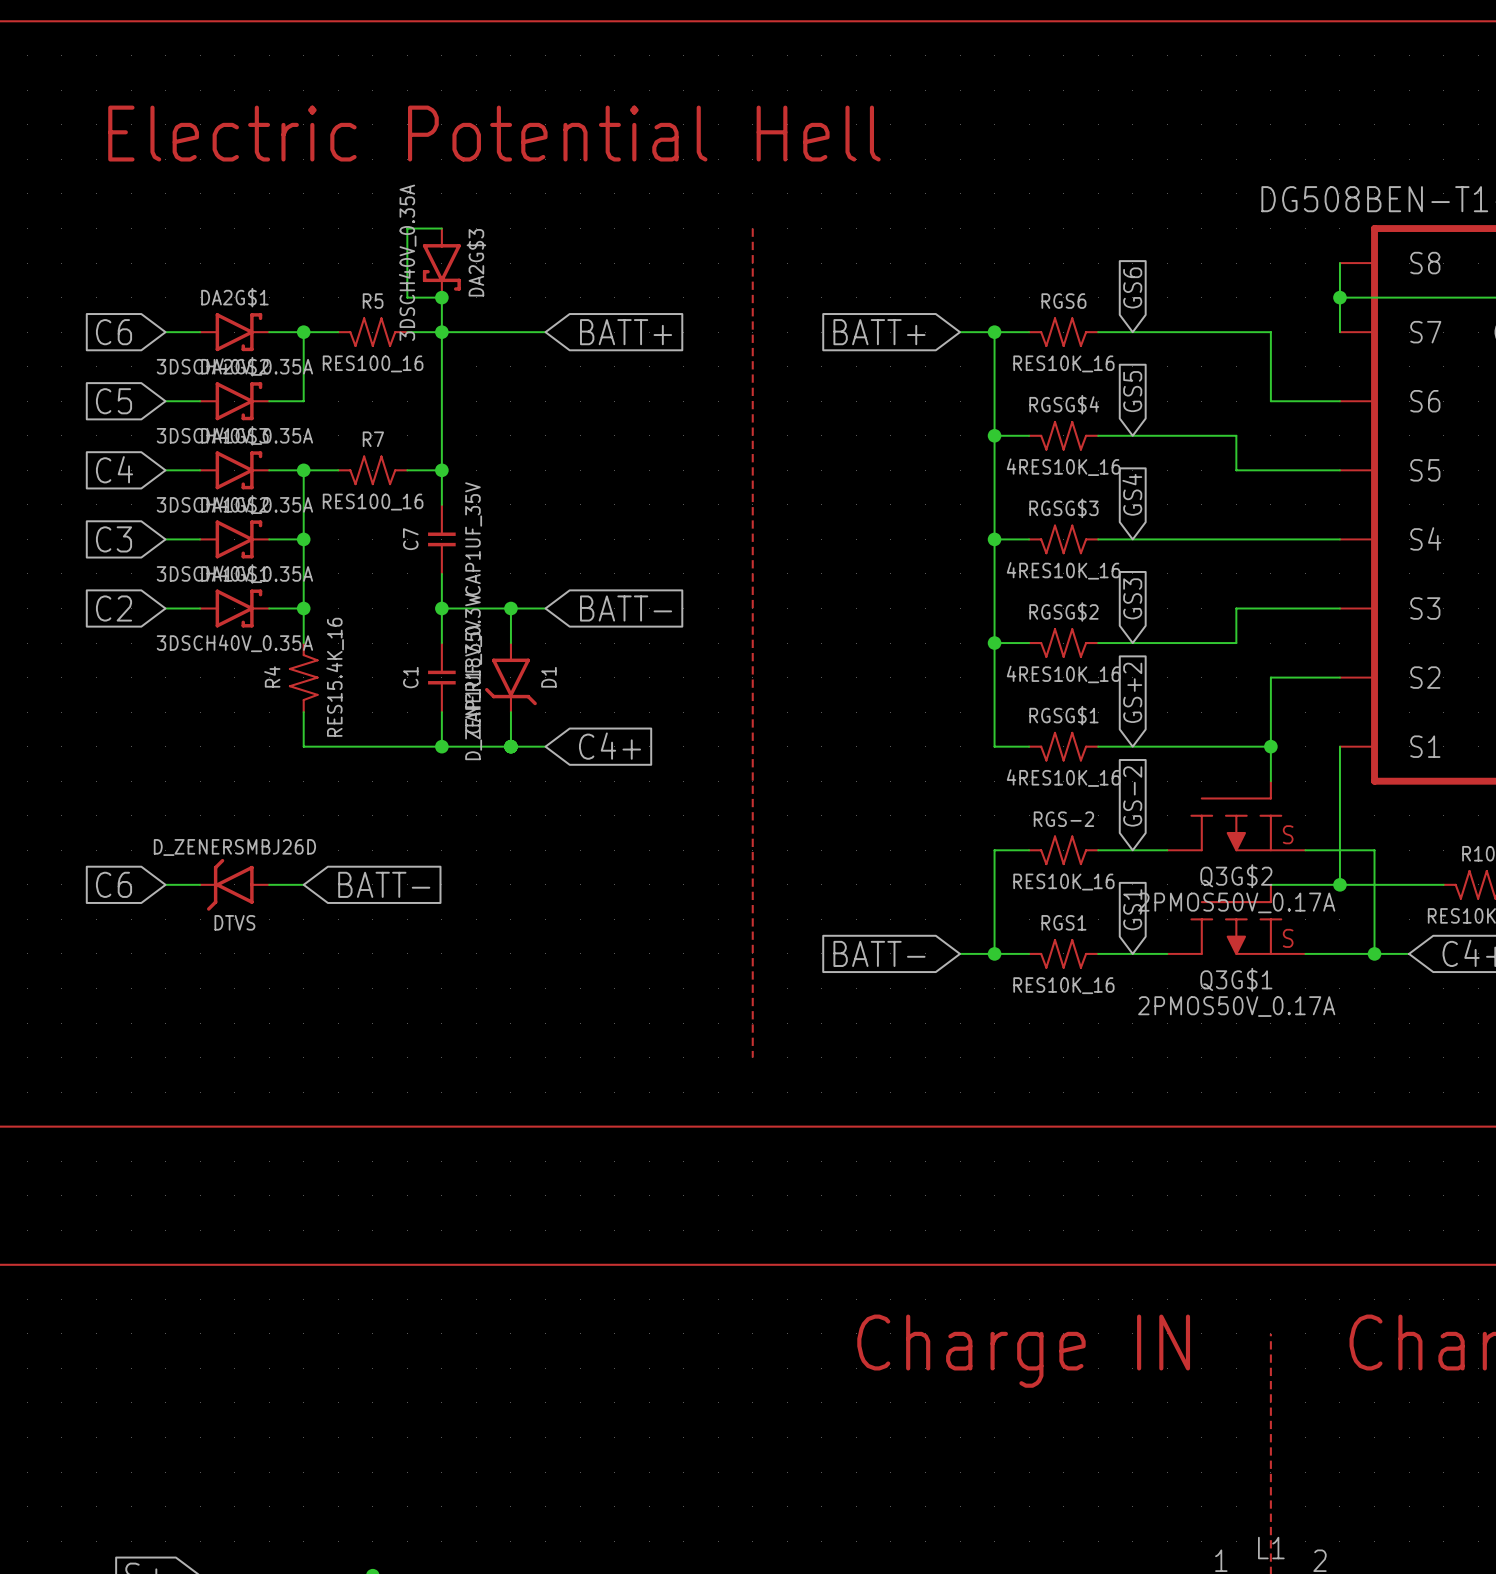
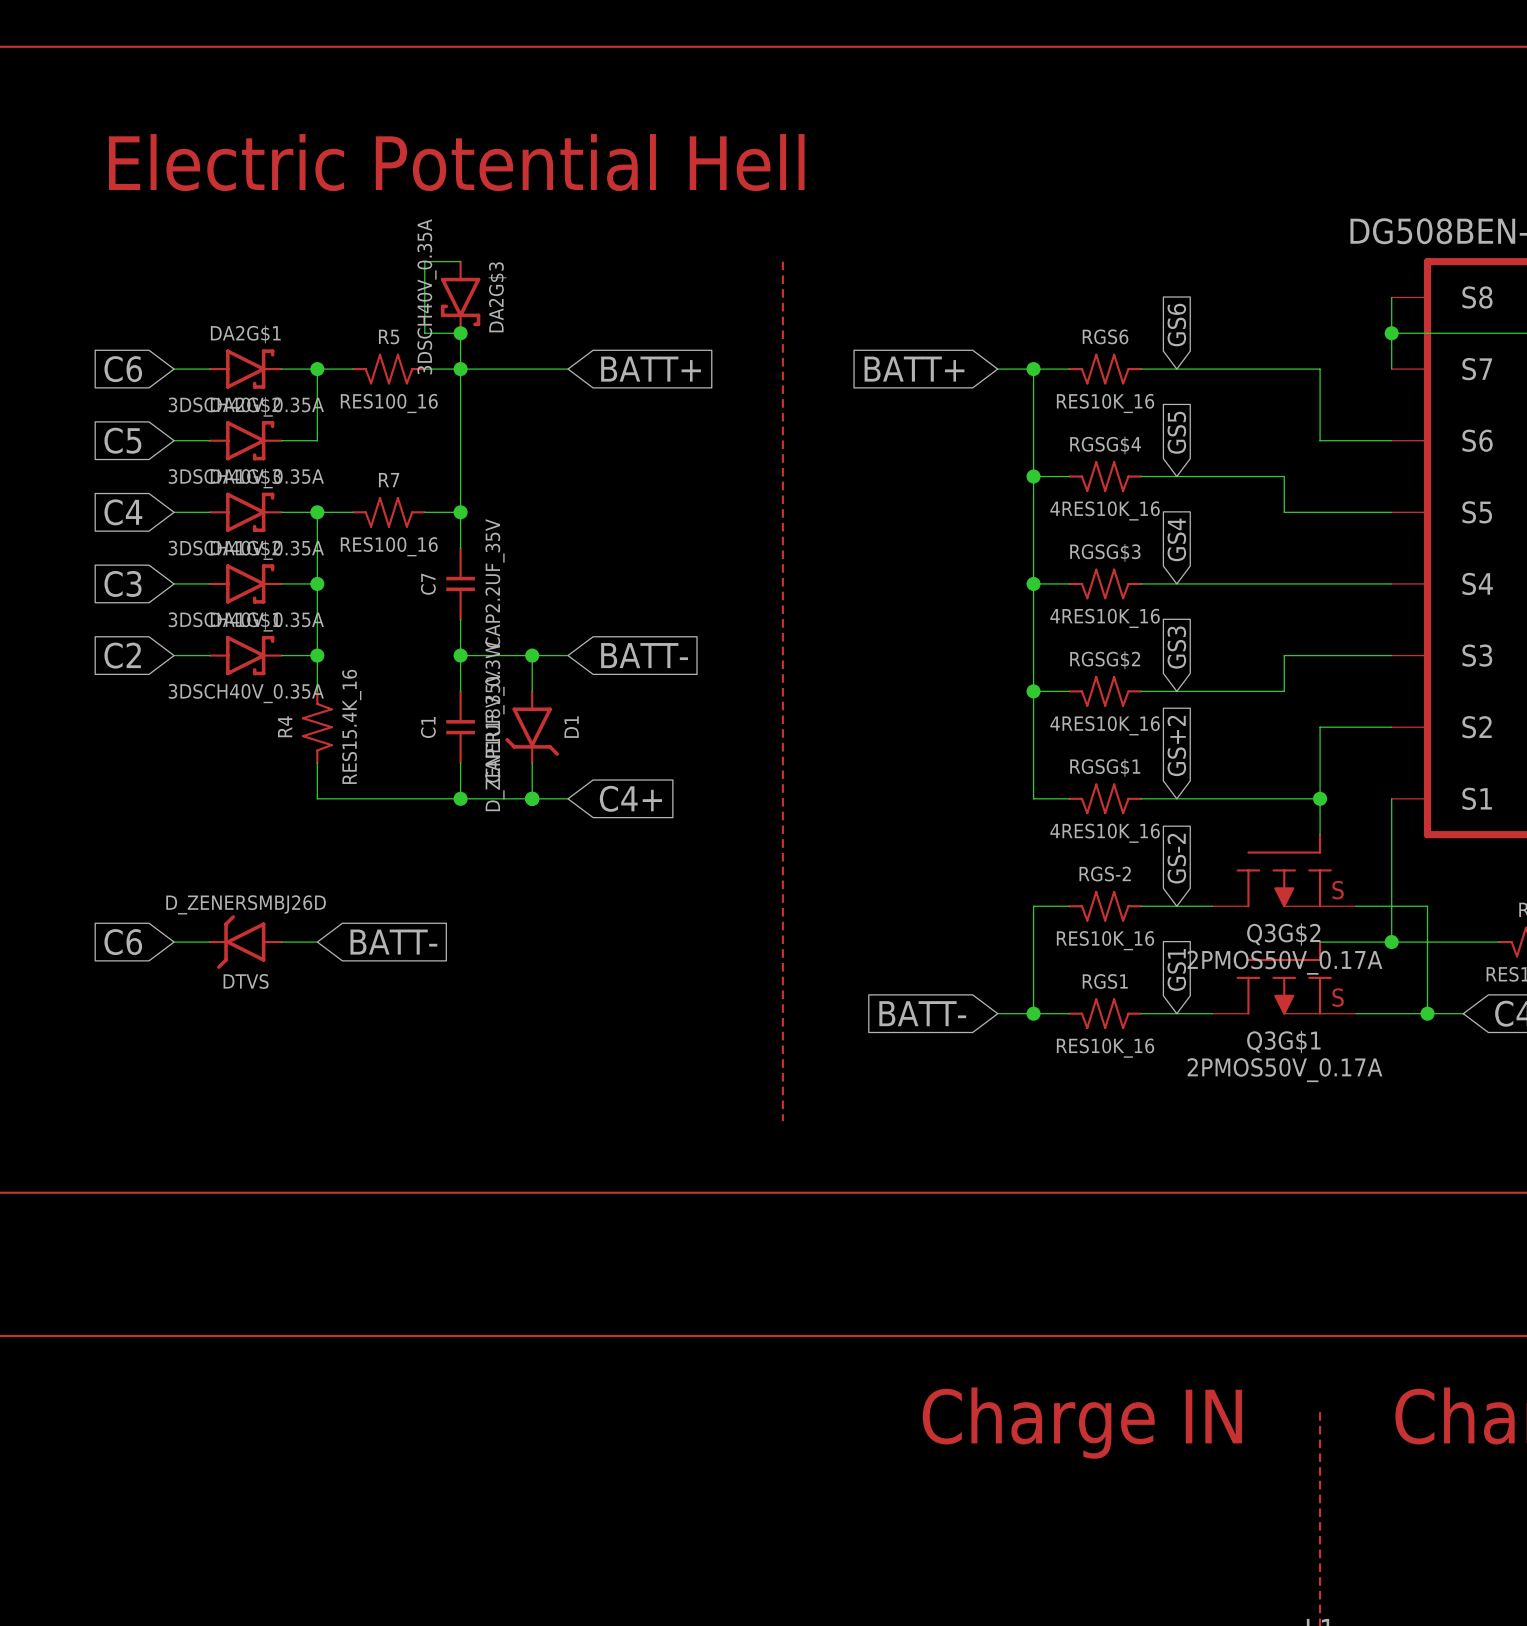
C7 value: CAP1UF_35V (473, 538) -> CAP2.2UF_35V (495, 583)

